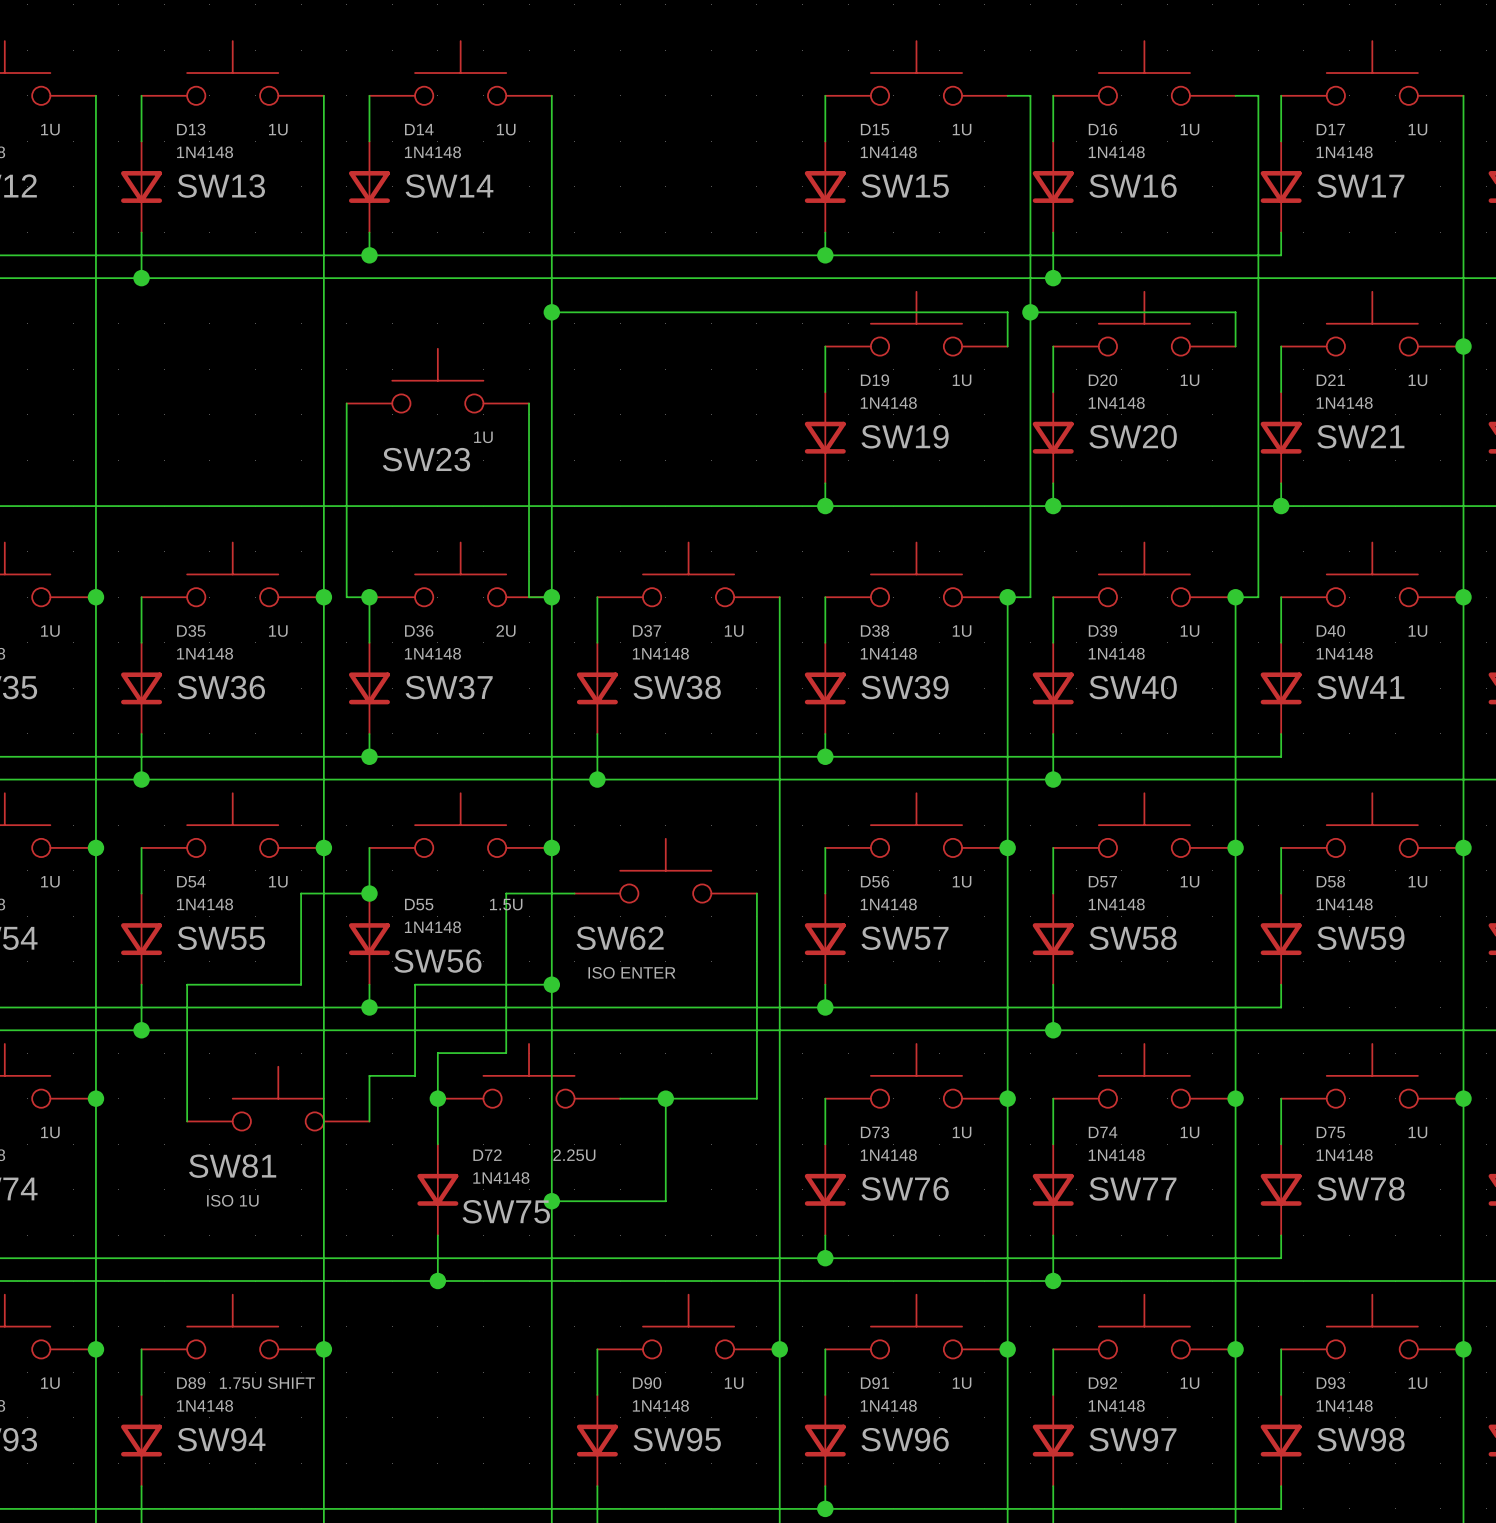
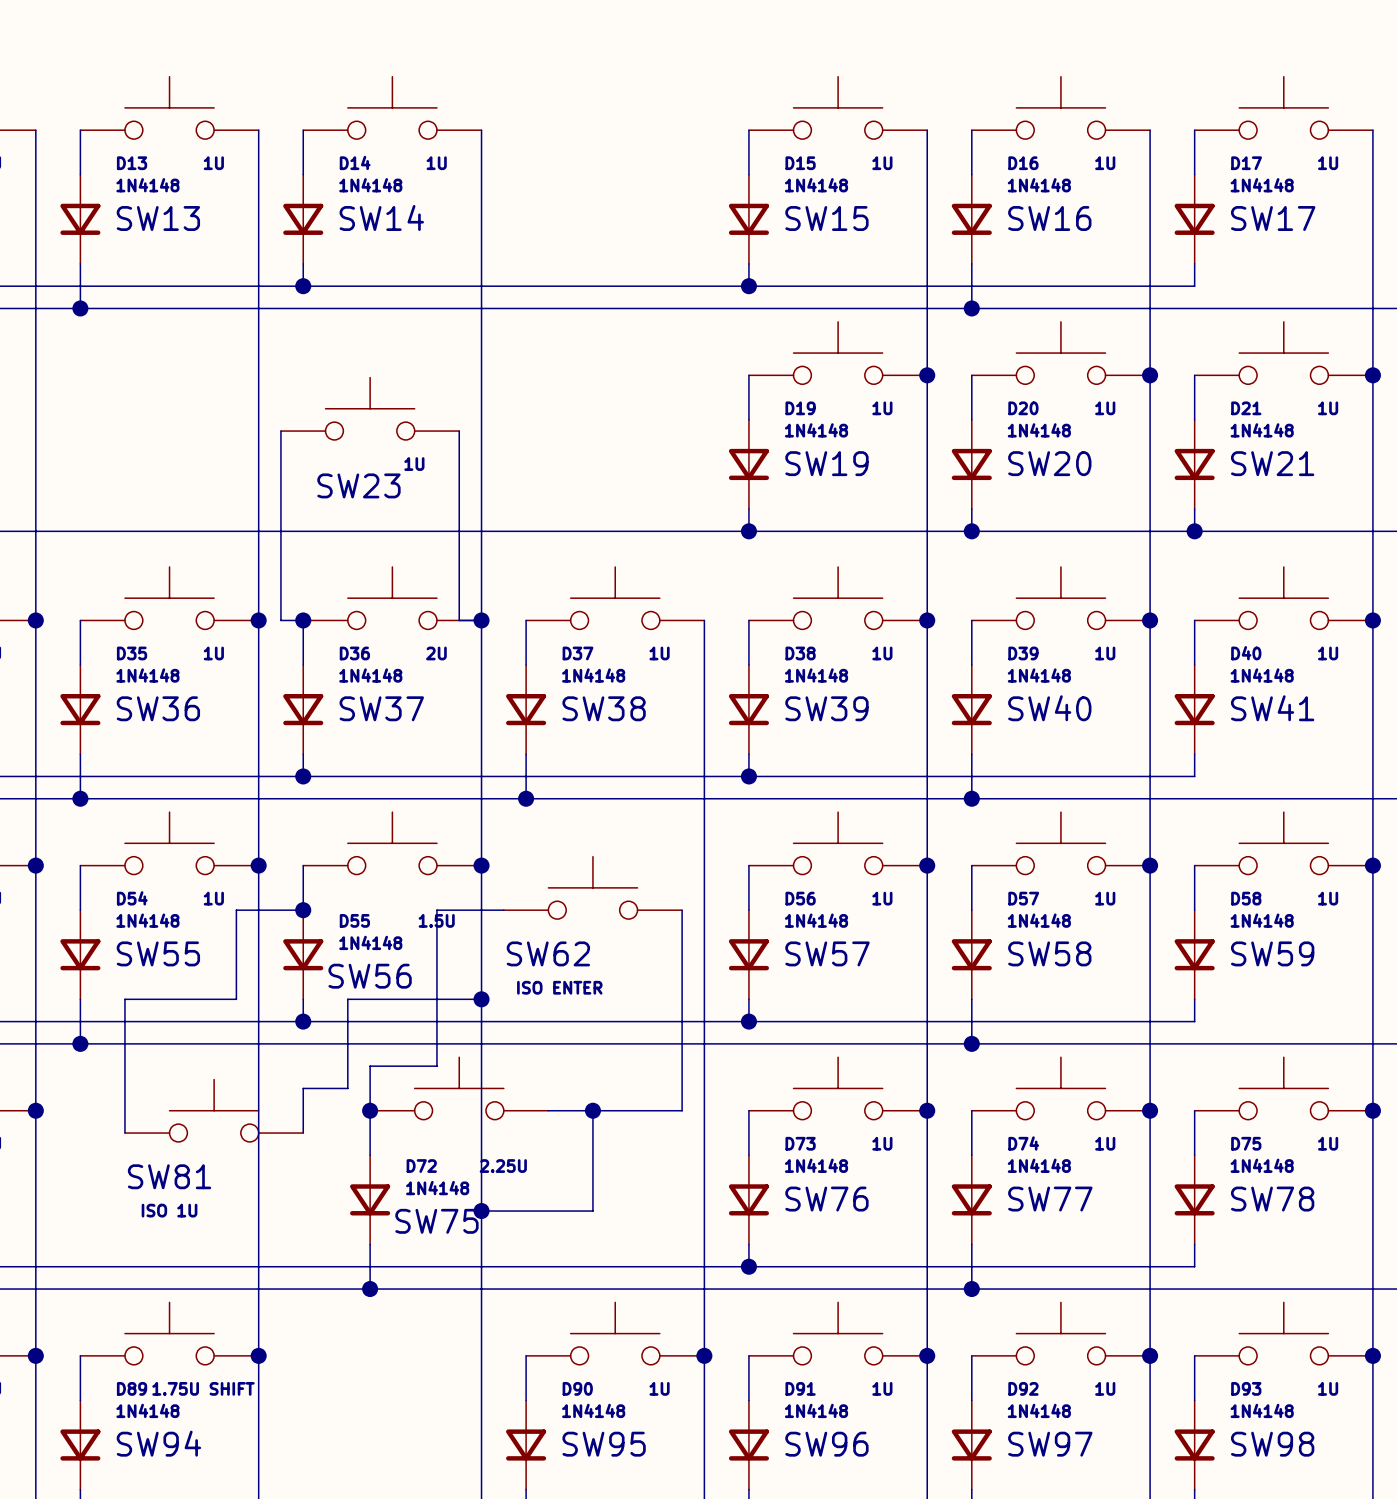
wire: (1007, 95) (1030, 95) (1030, 597) (1007, 597) -> (927, 375) (927, 620)
wire: (1235, 95) (1258, 95) (1258, 597) (1235, 597) -> (1150, 375) (1150, 620)
wire: (551, 312) (1007, 312) -> (927, 130) (927, 341)
junction: (551, 312) -> none
wire: (1030, 312) (1235, 312) -> (1150, 130) (1150, 341)
junction position: (1030, 312) -> (927, 375)
junction: none -> (1150, 375)

